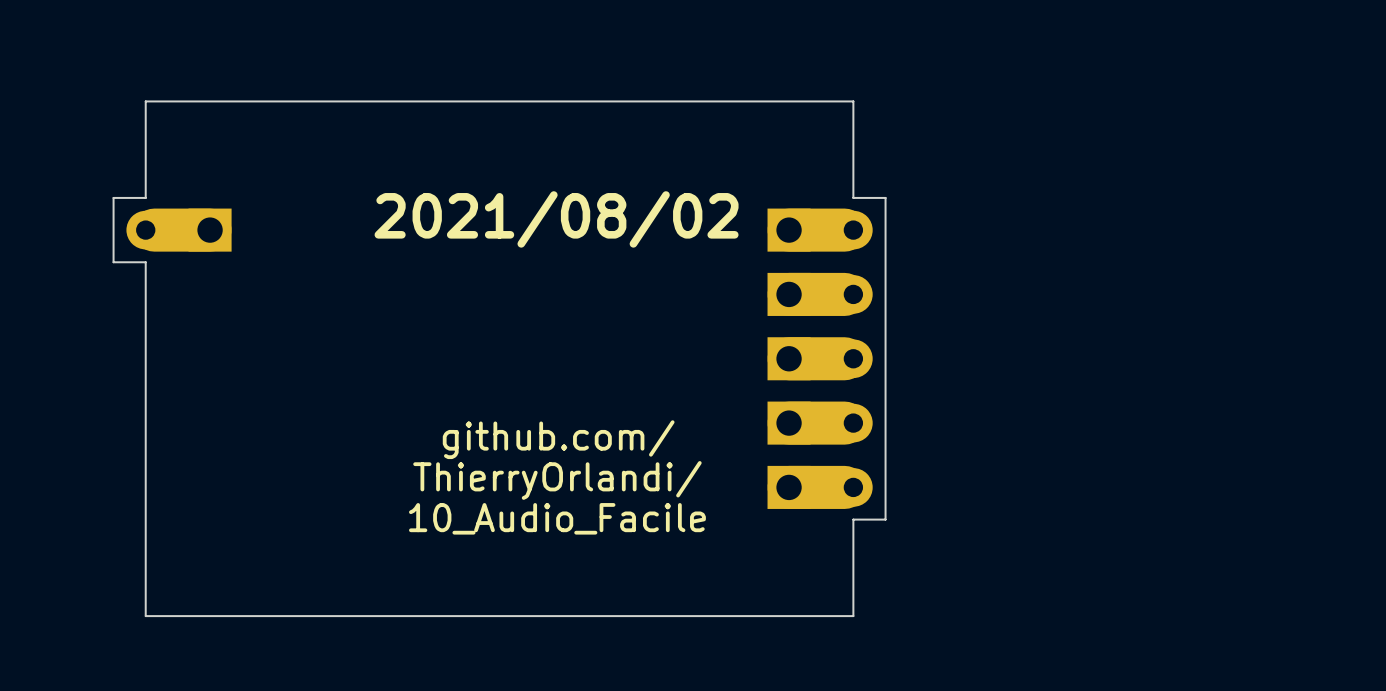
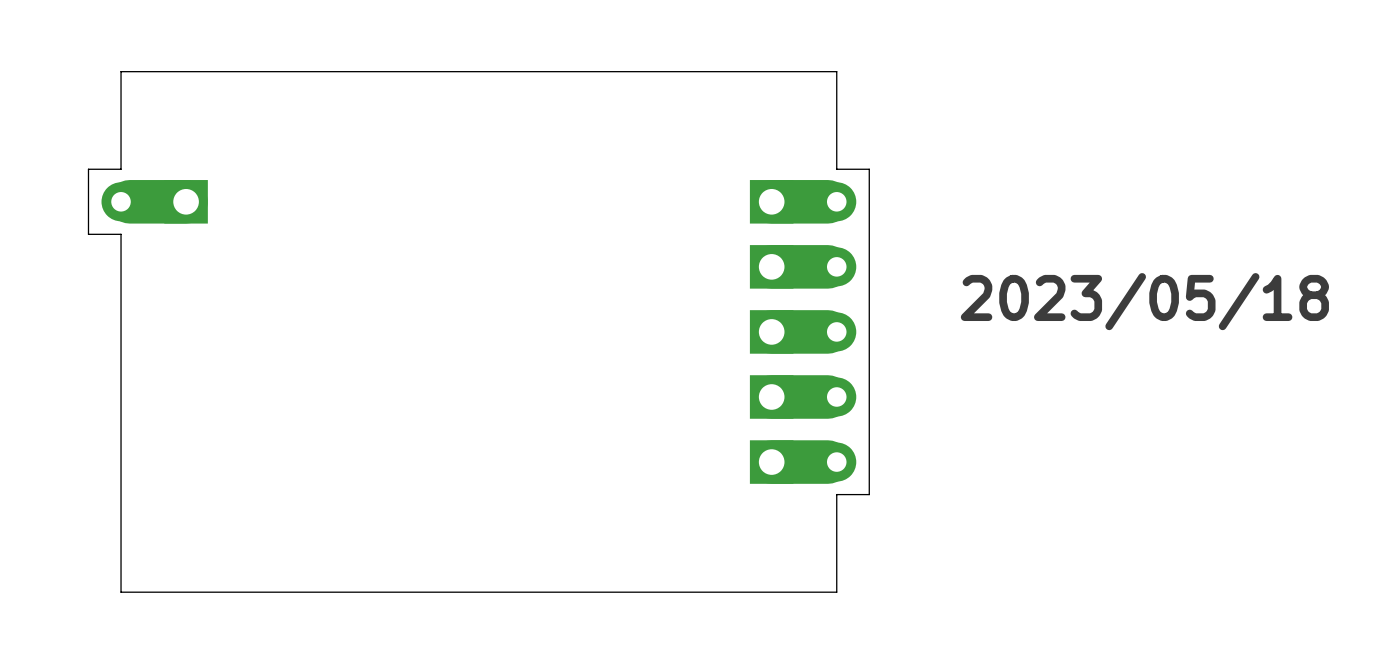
text: 2021/08/02 (556, 219) -> none
text: none -> 2023/05/18 (1144, 301)
text: github.com/ (558, 439) -> none
text: ThierryOrlandi/ (557, 480) -> none
text: 10_Audio_Facile (557, 518) -> none

